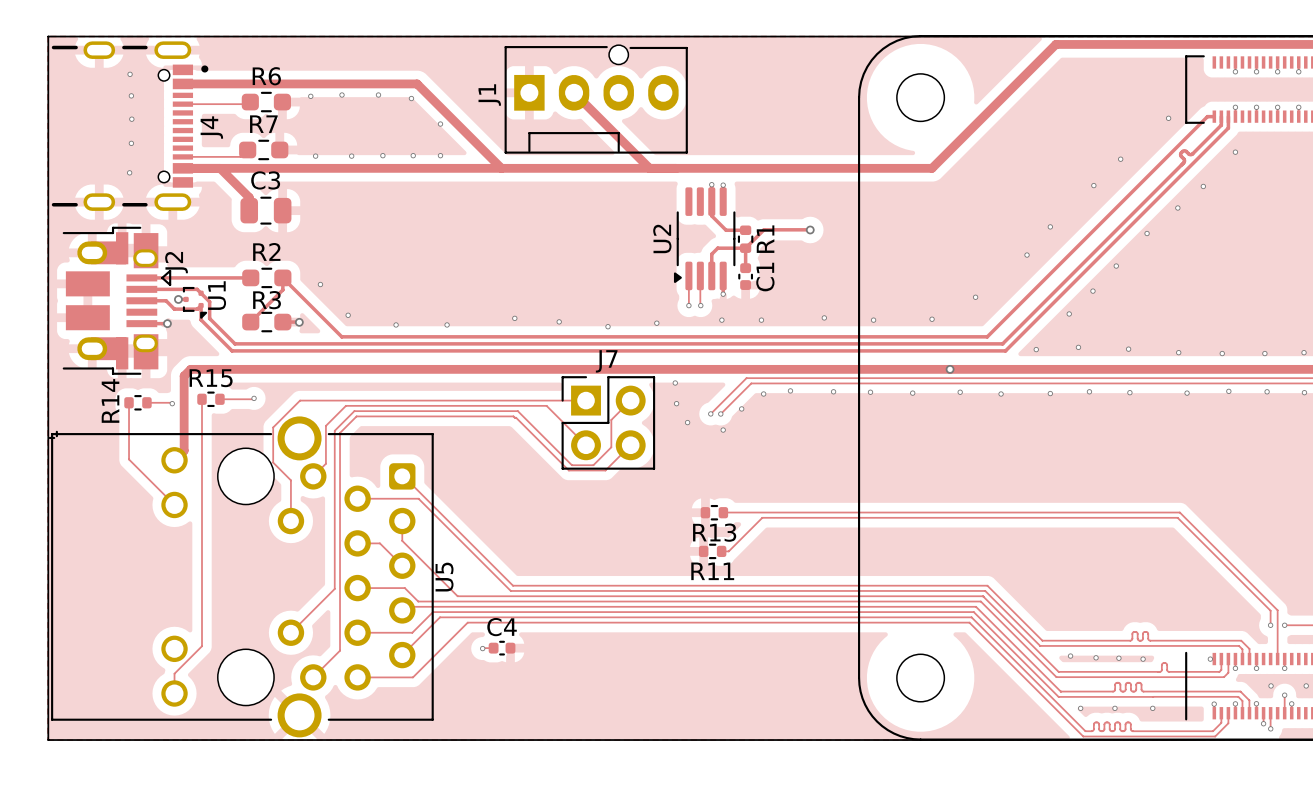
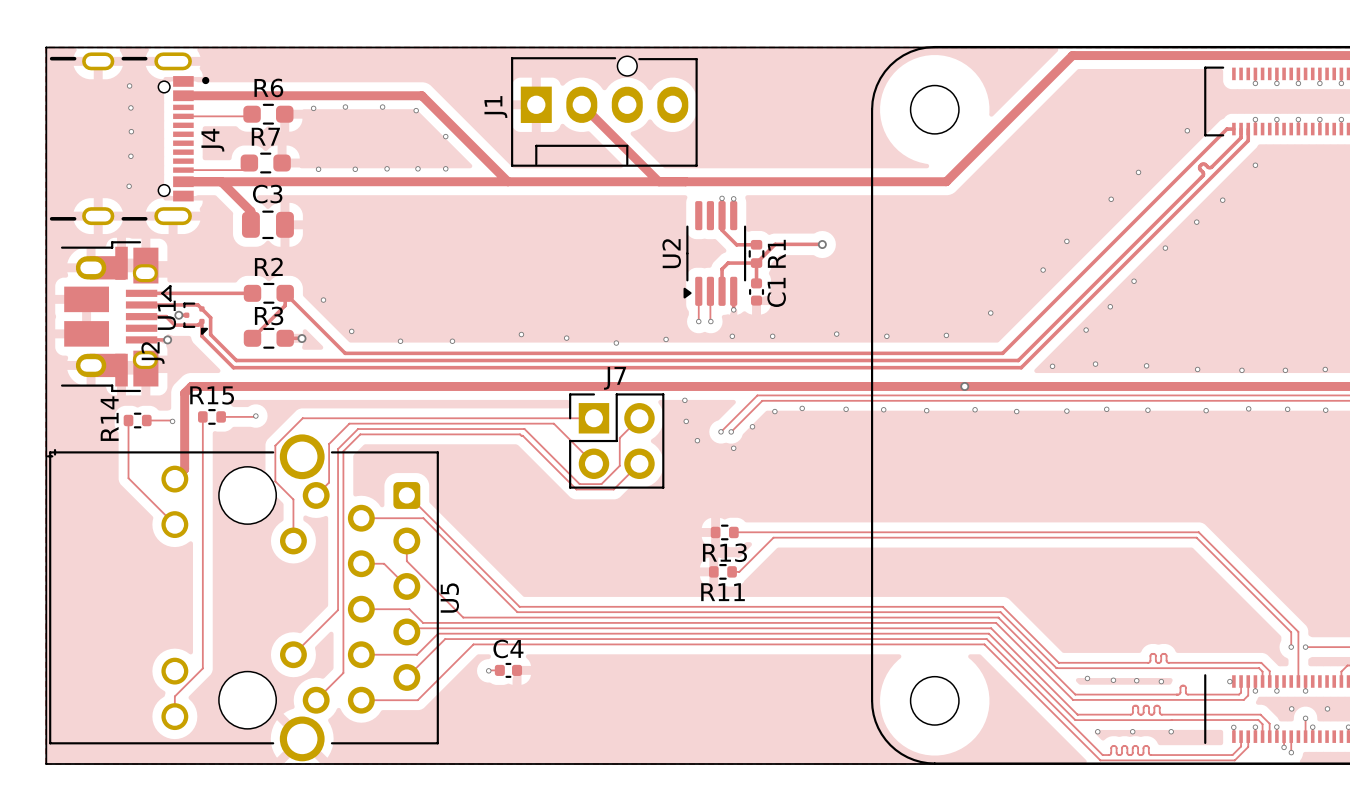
J2 name position: J2 (176, 262) -> J2 (152, 352)
U1 name position: U1 (217, 295) -> U1 (166, 315)

